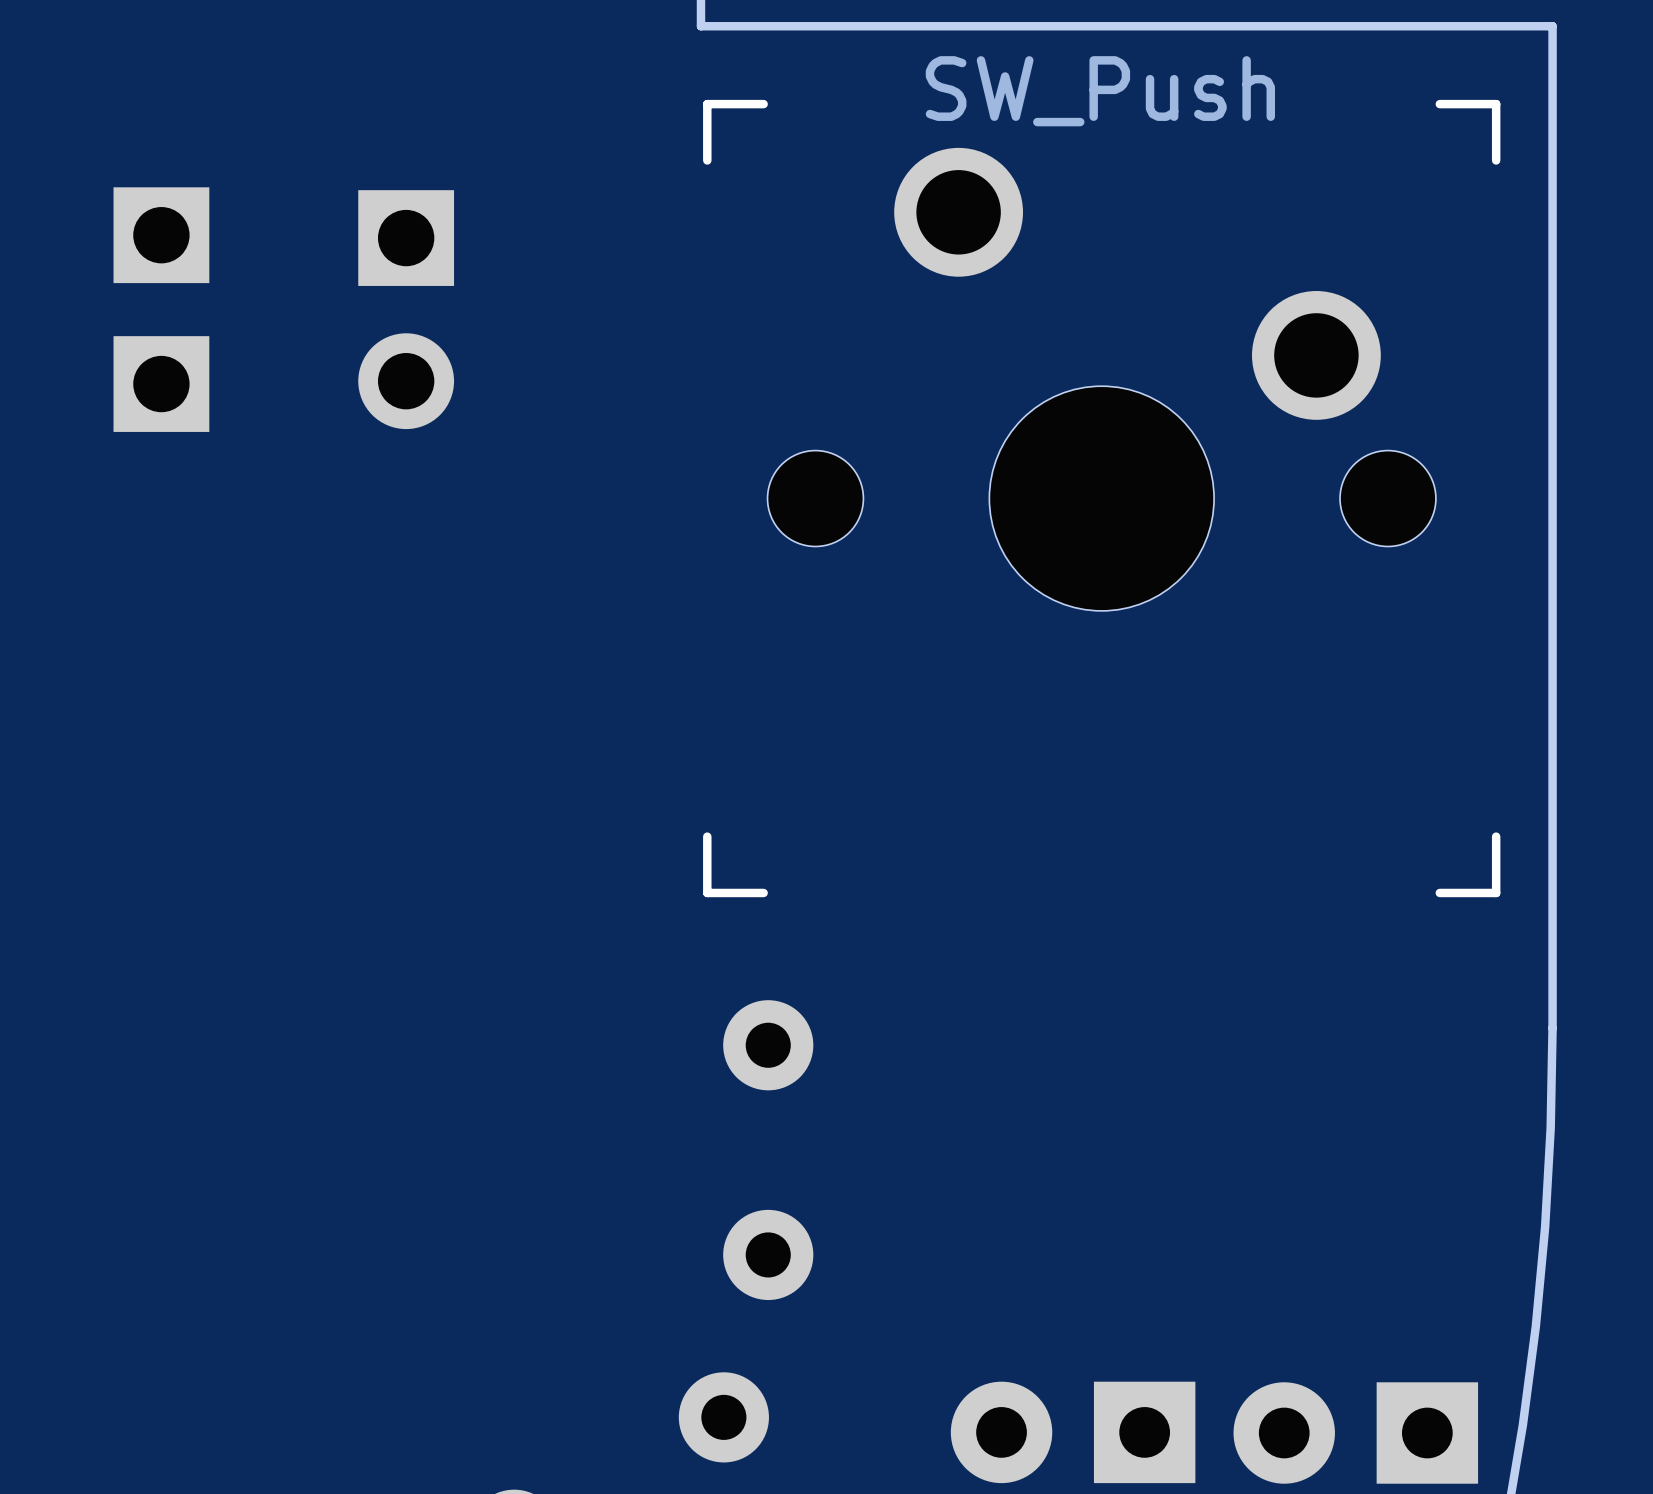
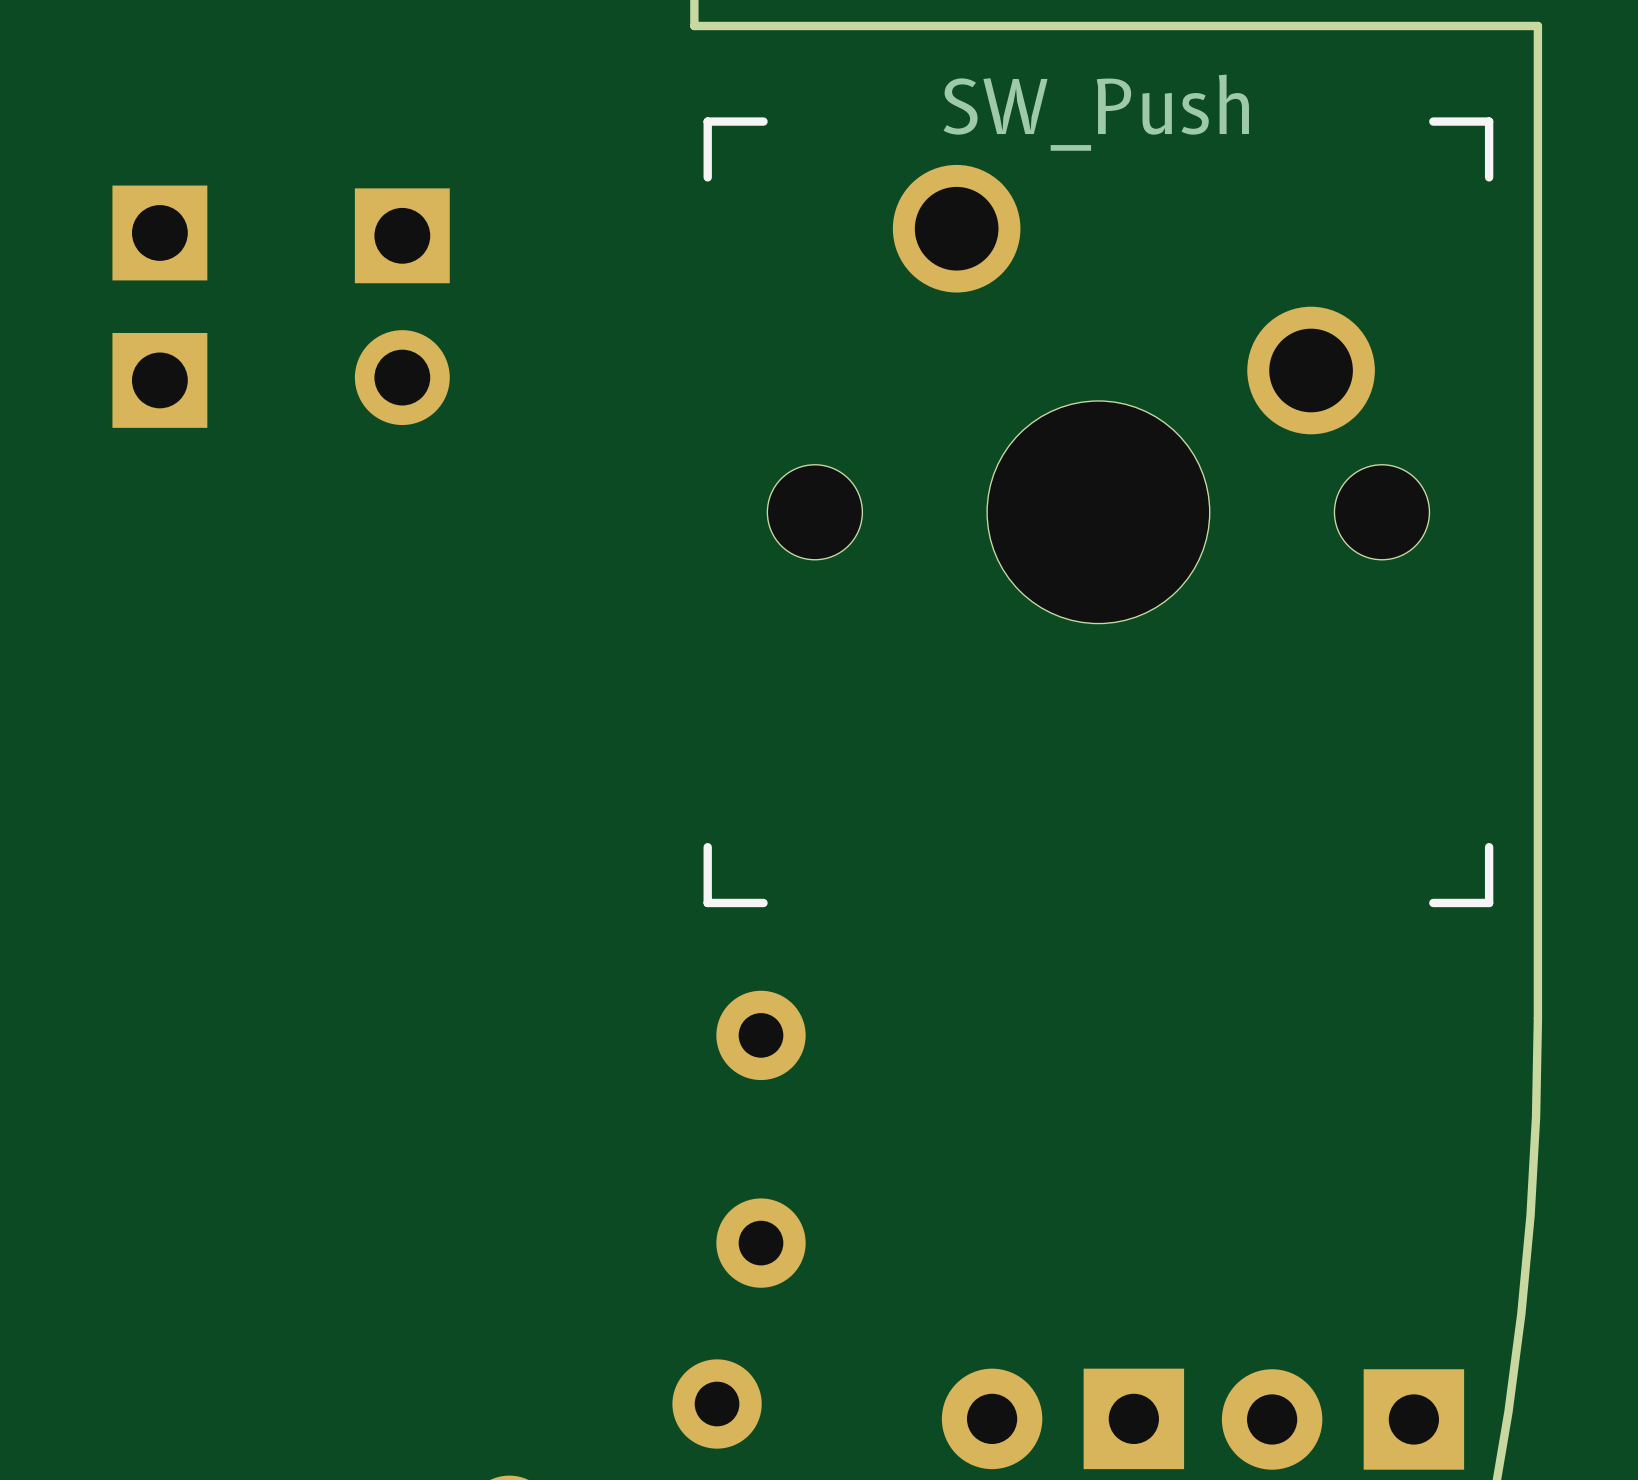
part position: (1101, 498) -> (1098, 512)

